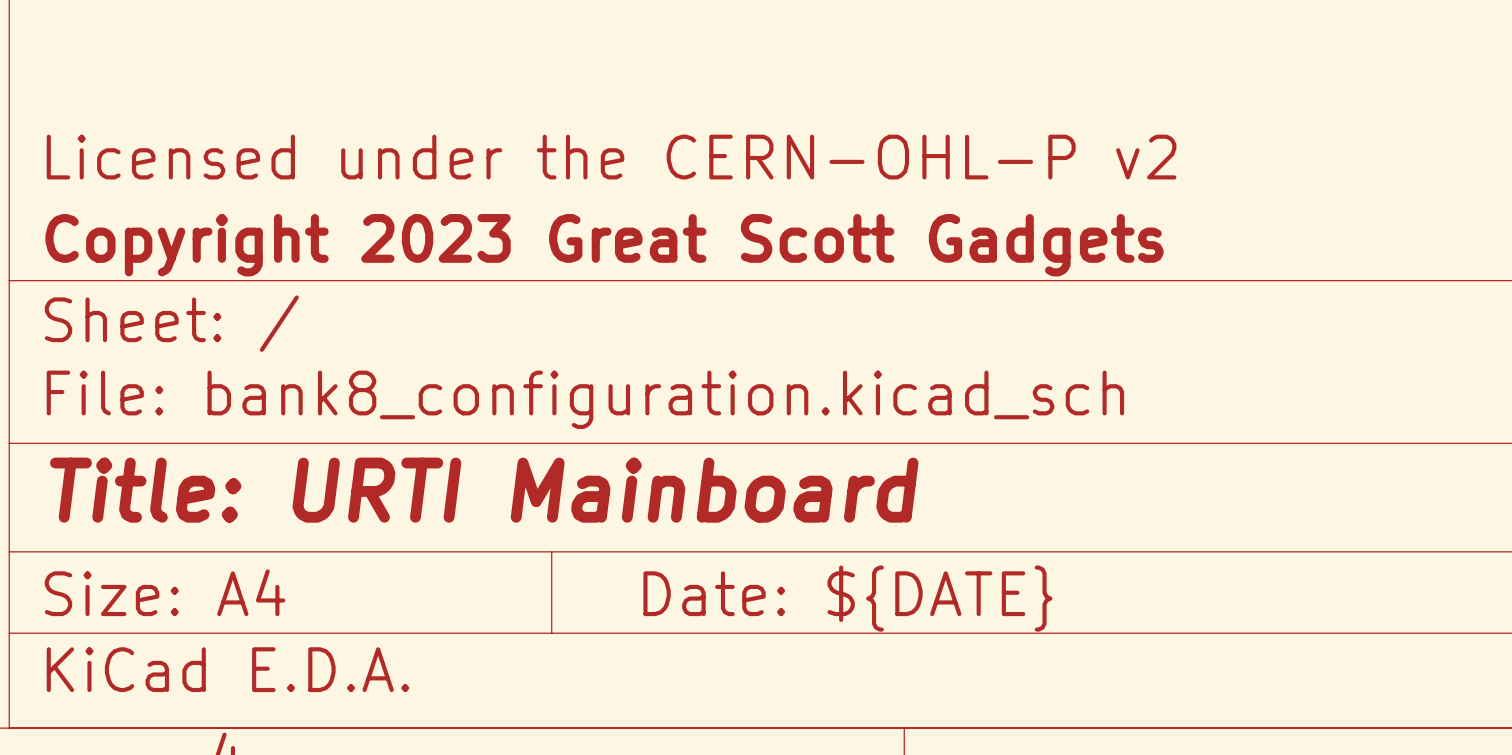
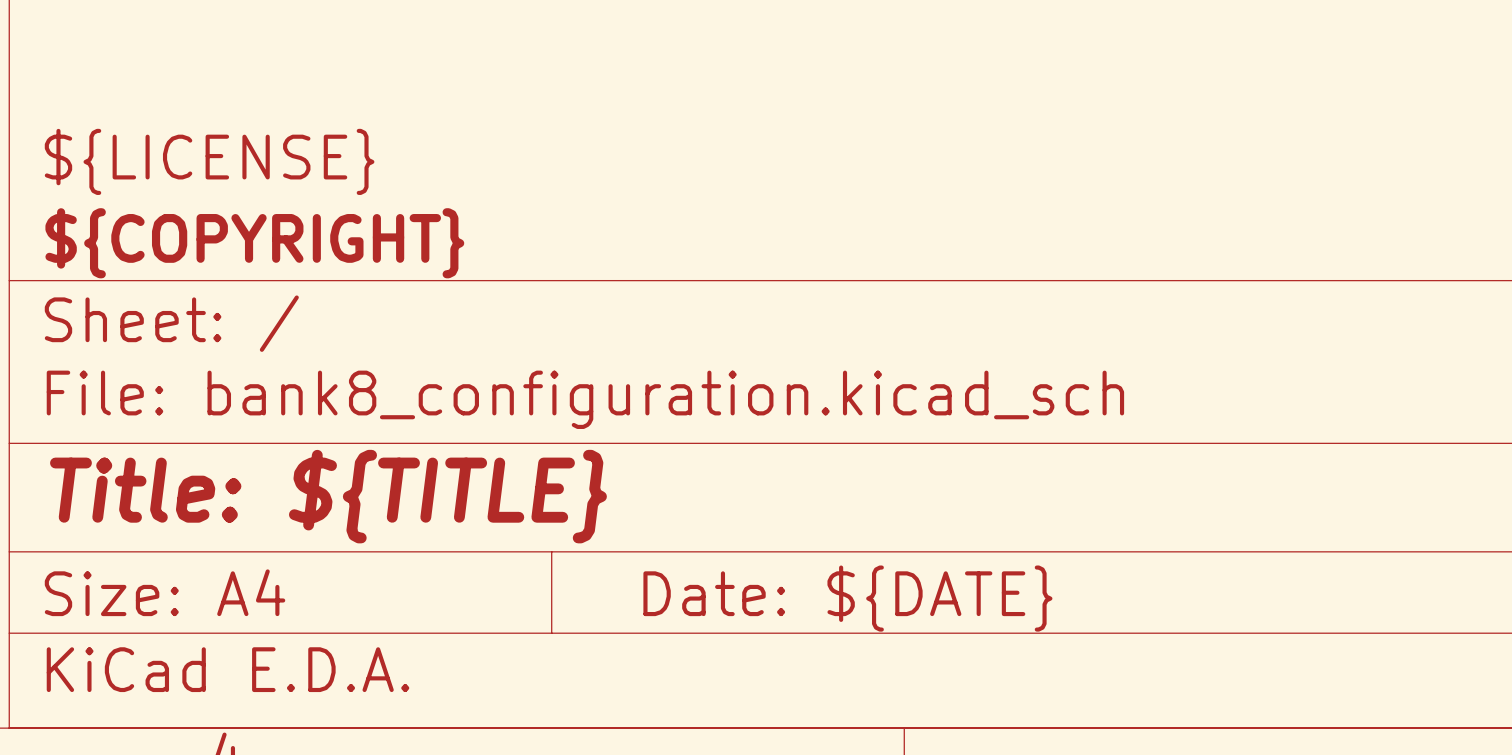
title block: Licensed under the CERN-OHL-P v2 (611, 157) -> ${LICENSE} (209, 161)
title block: Copyright 2023 Great Scott Gadgets (604, 245) -> ${COPYRIGHT} (254, 243)
title block: Title: URTI Mainboard (484, 490) -> Title: ${TITLE} (328, 496)

